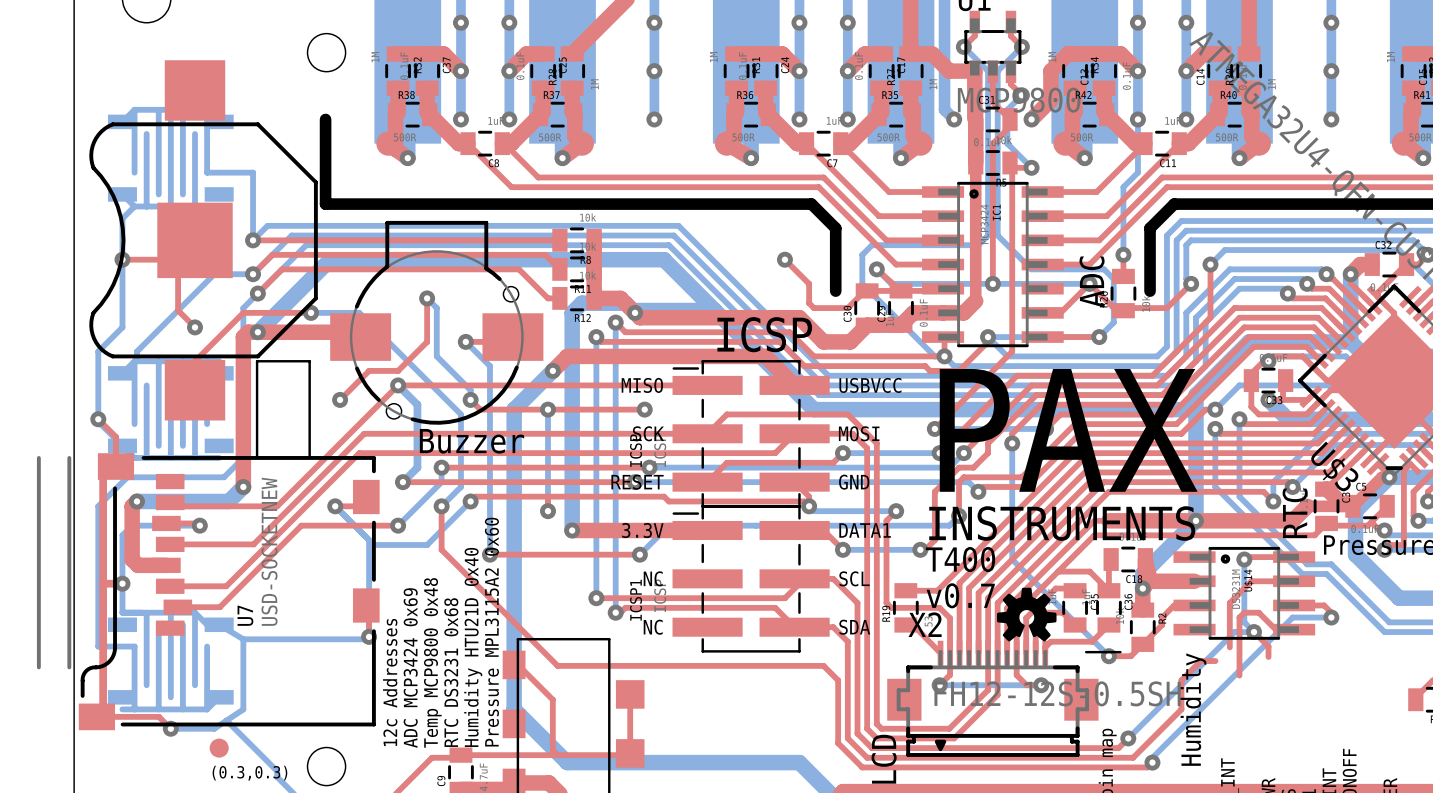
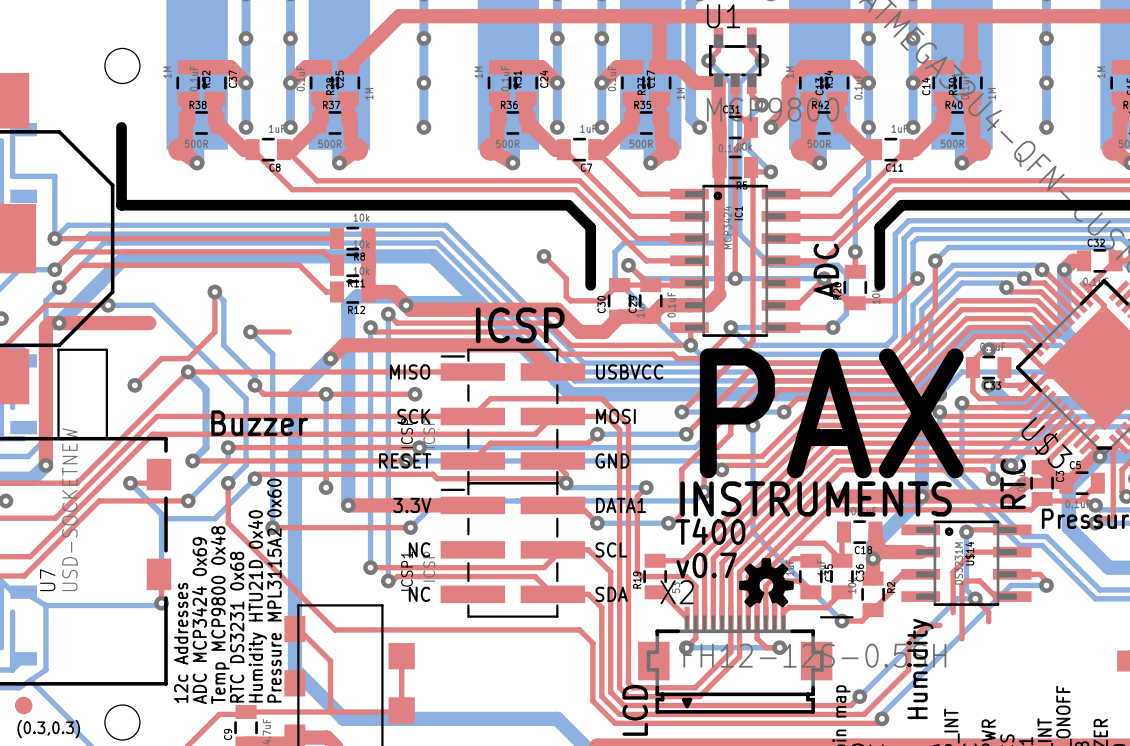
part: (436, 322) -> none

